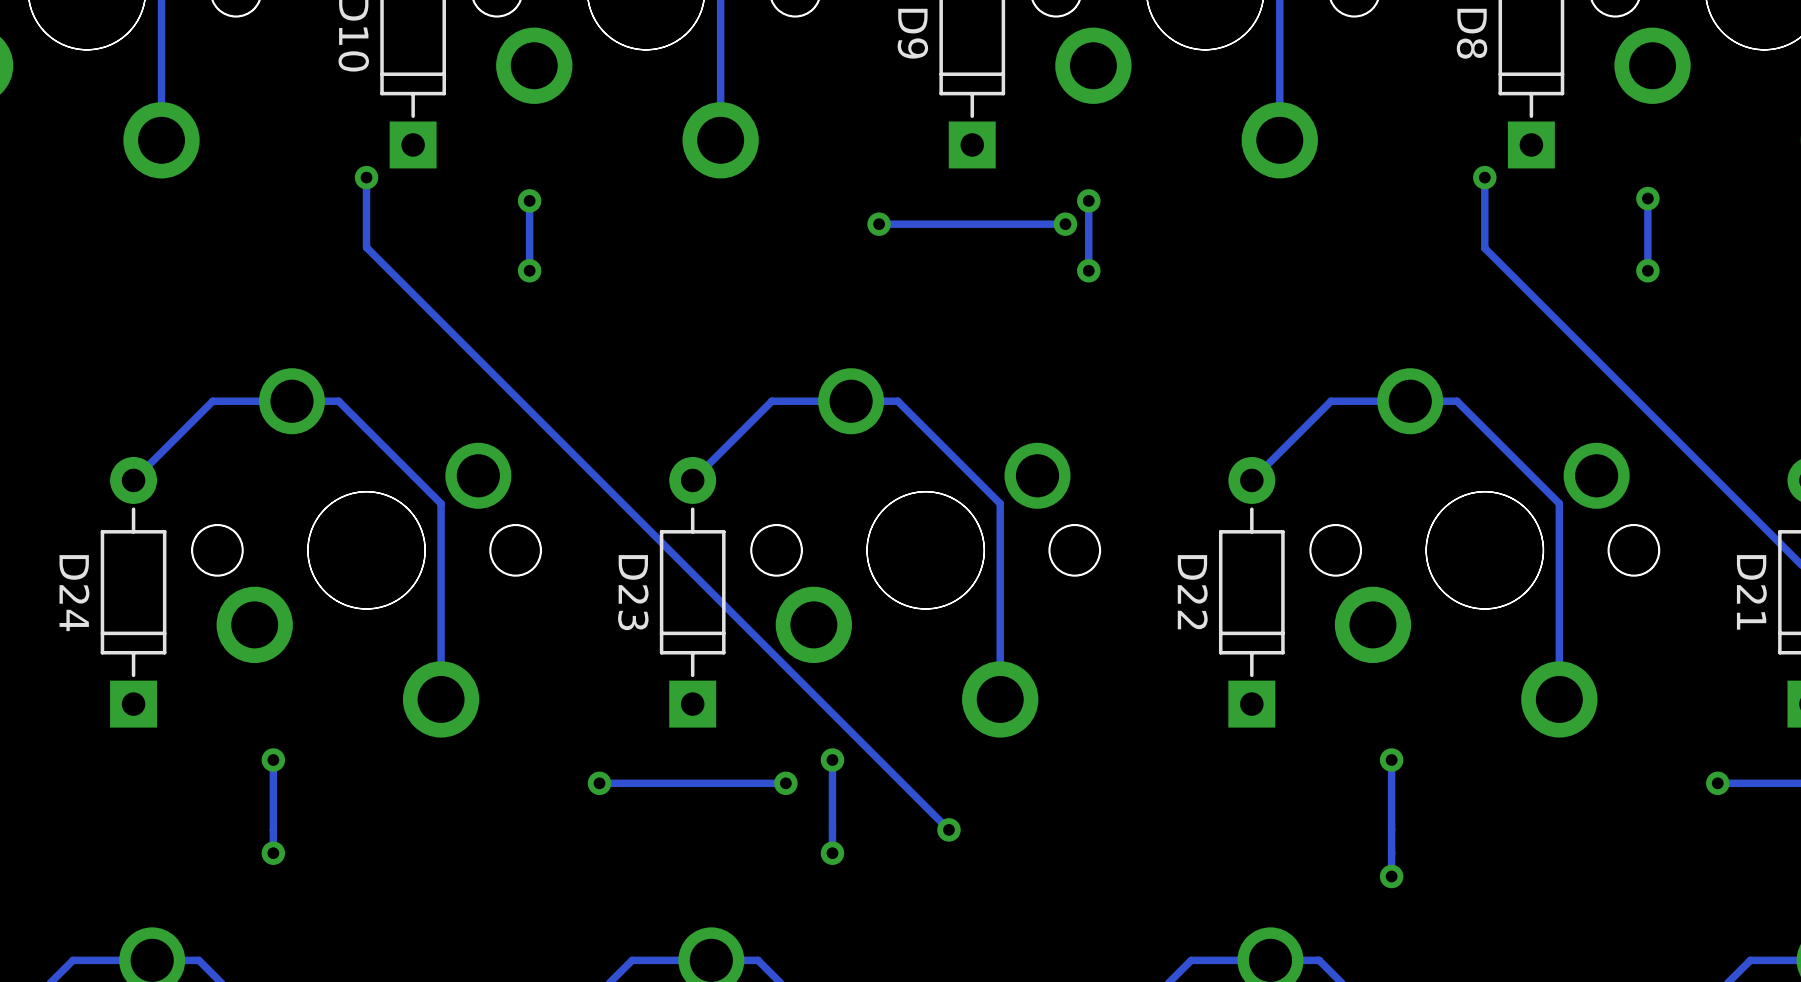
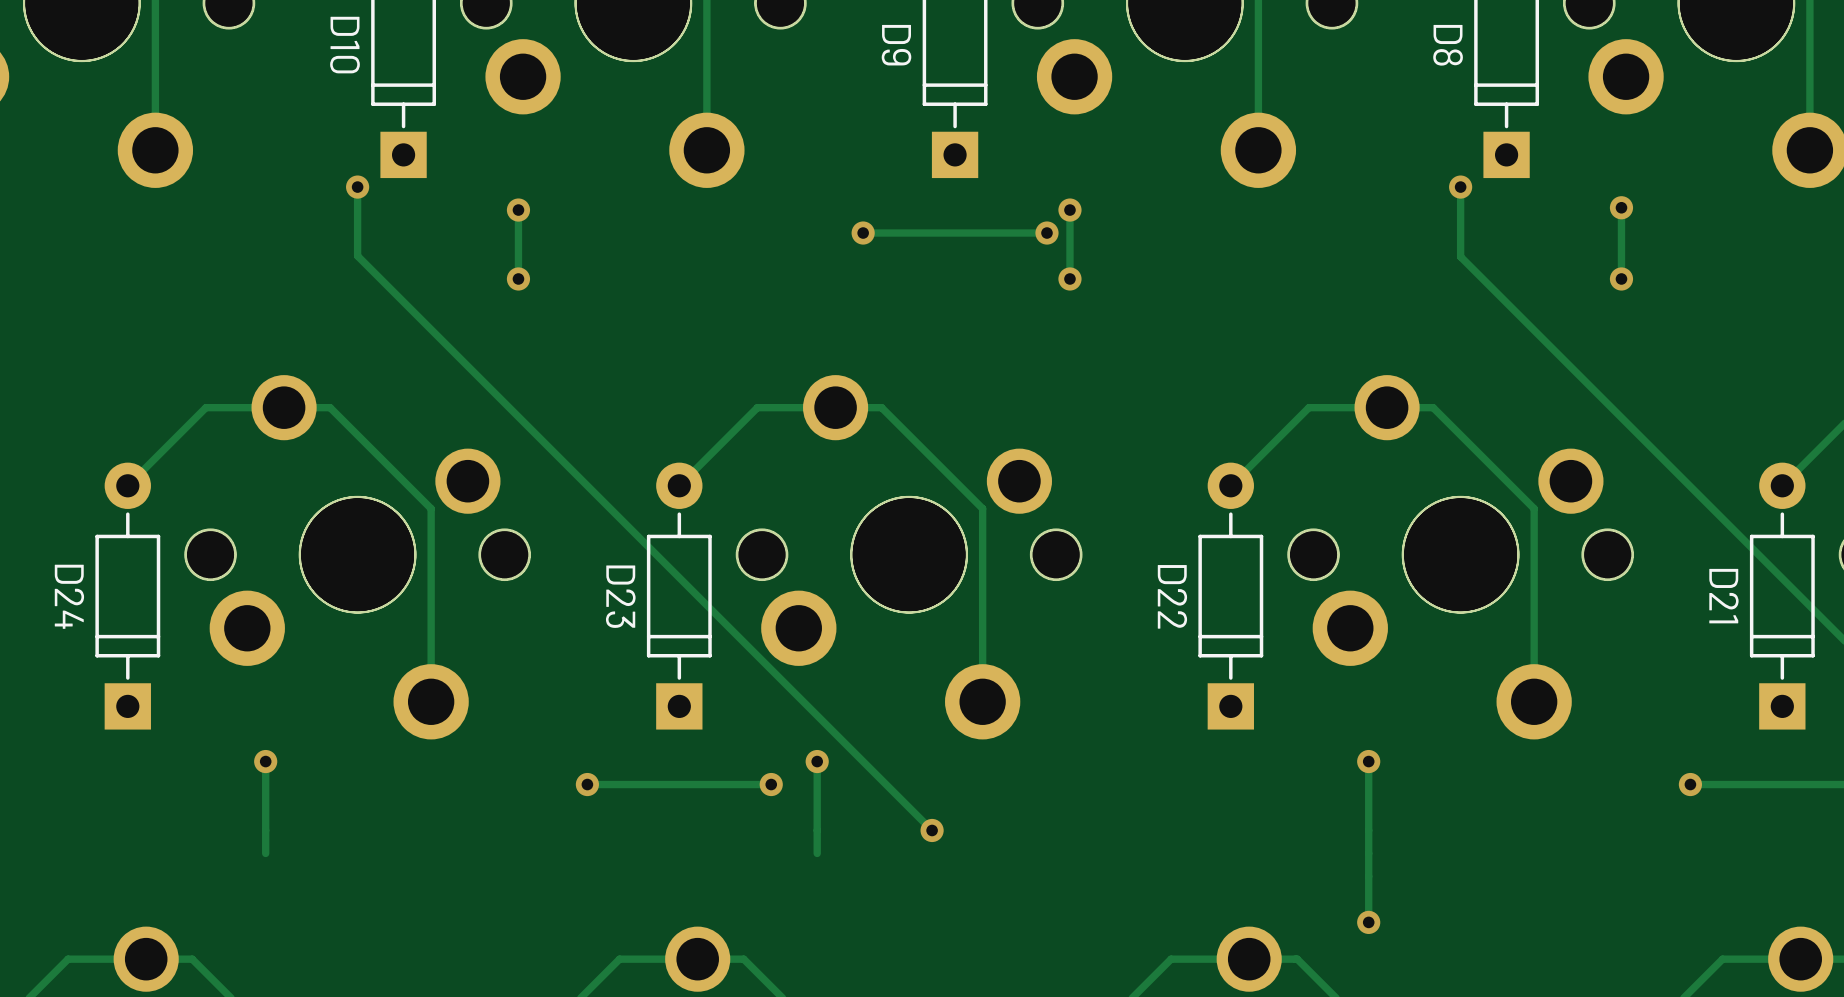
via: (273, 853) -> none
via: (832, 853) -> none
track: none -> (1368, 876) (1368, 922)
via position: (1391, 876) -> (1368, 922)

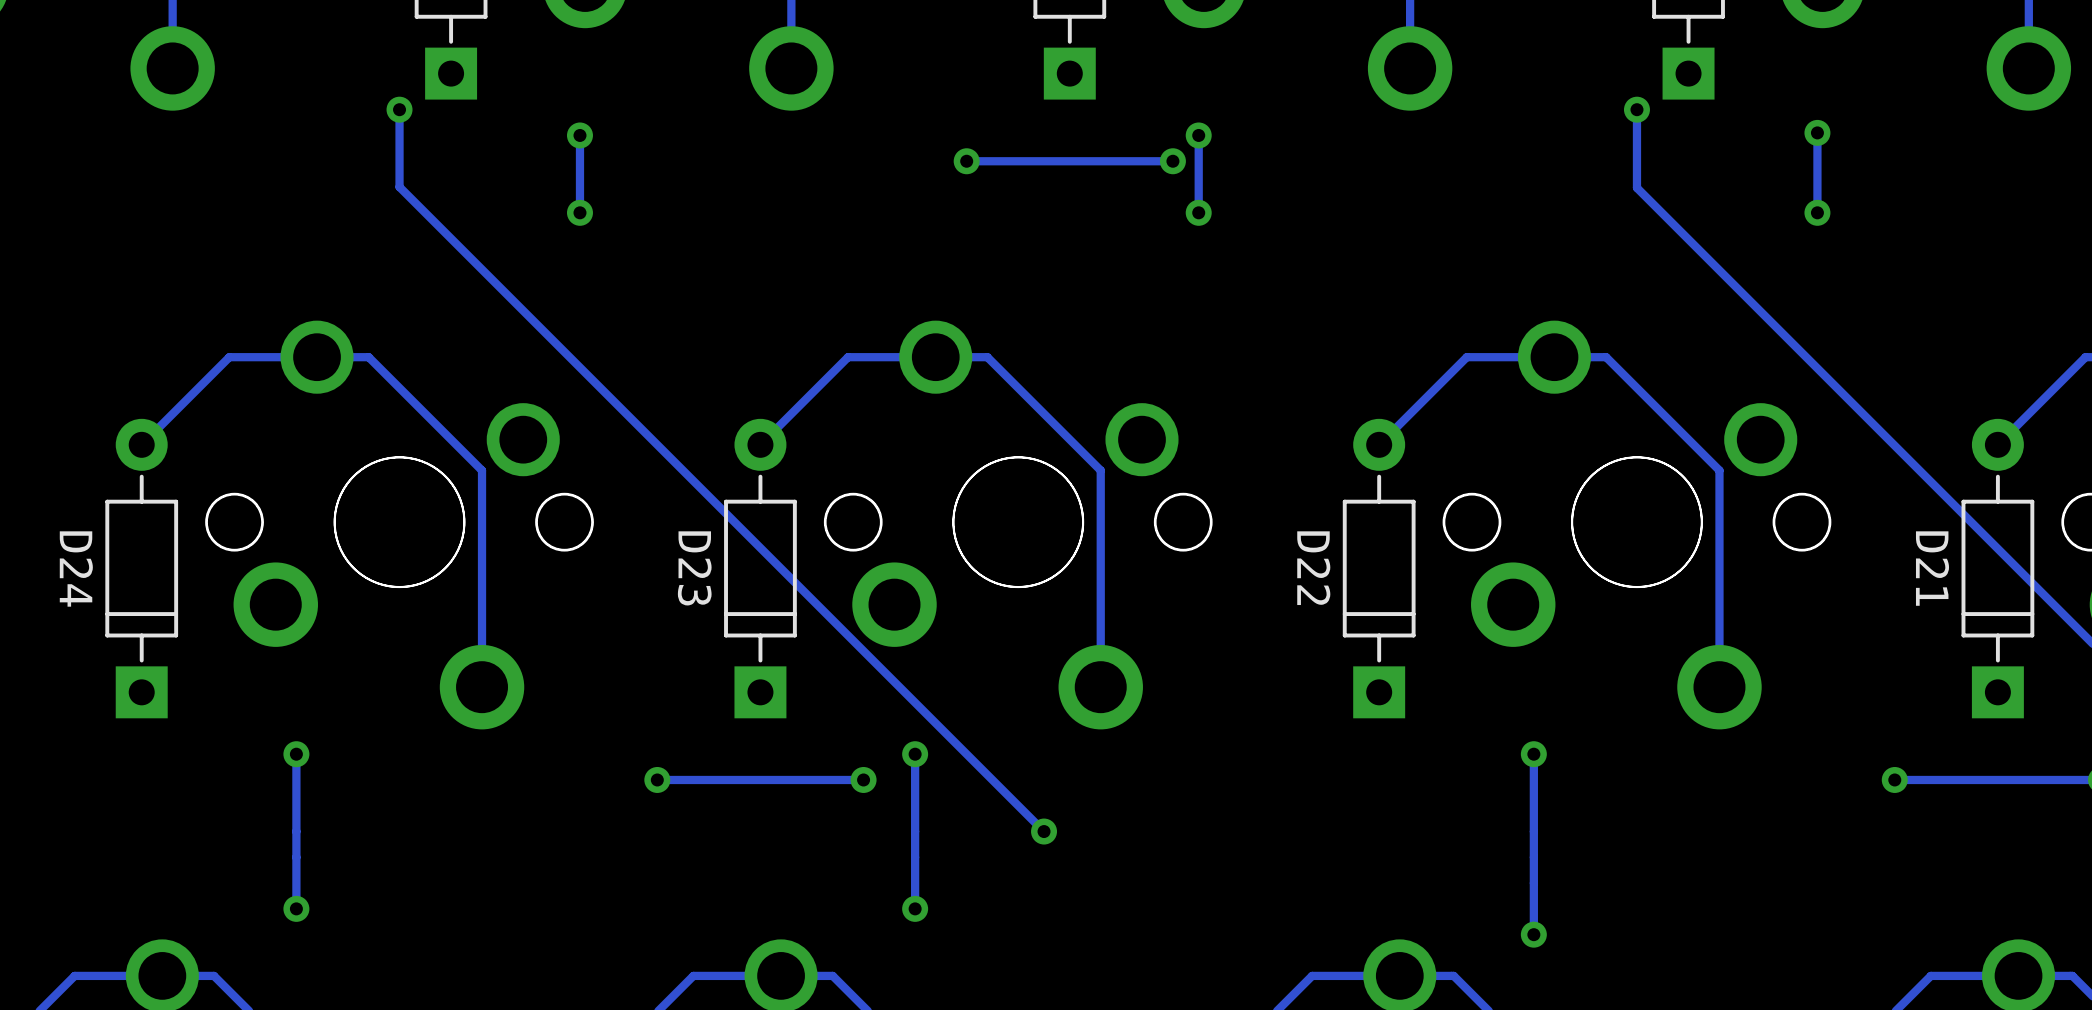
track: none -> (296, 857) (296, 908)
track: none -> (915, 857) (915, 908)
via: none -> (296, 908)
via: none -> (915, 908)

